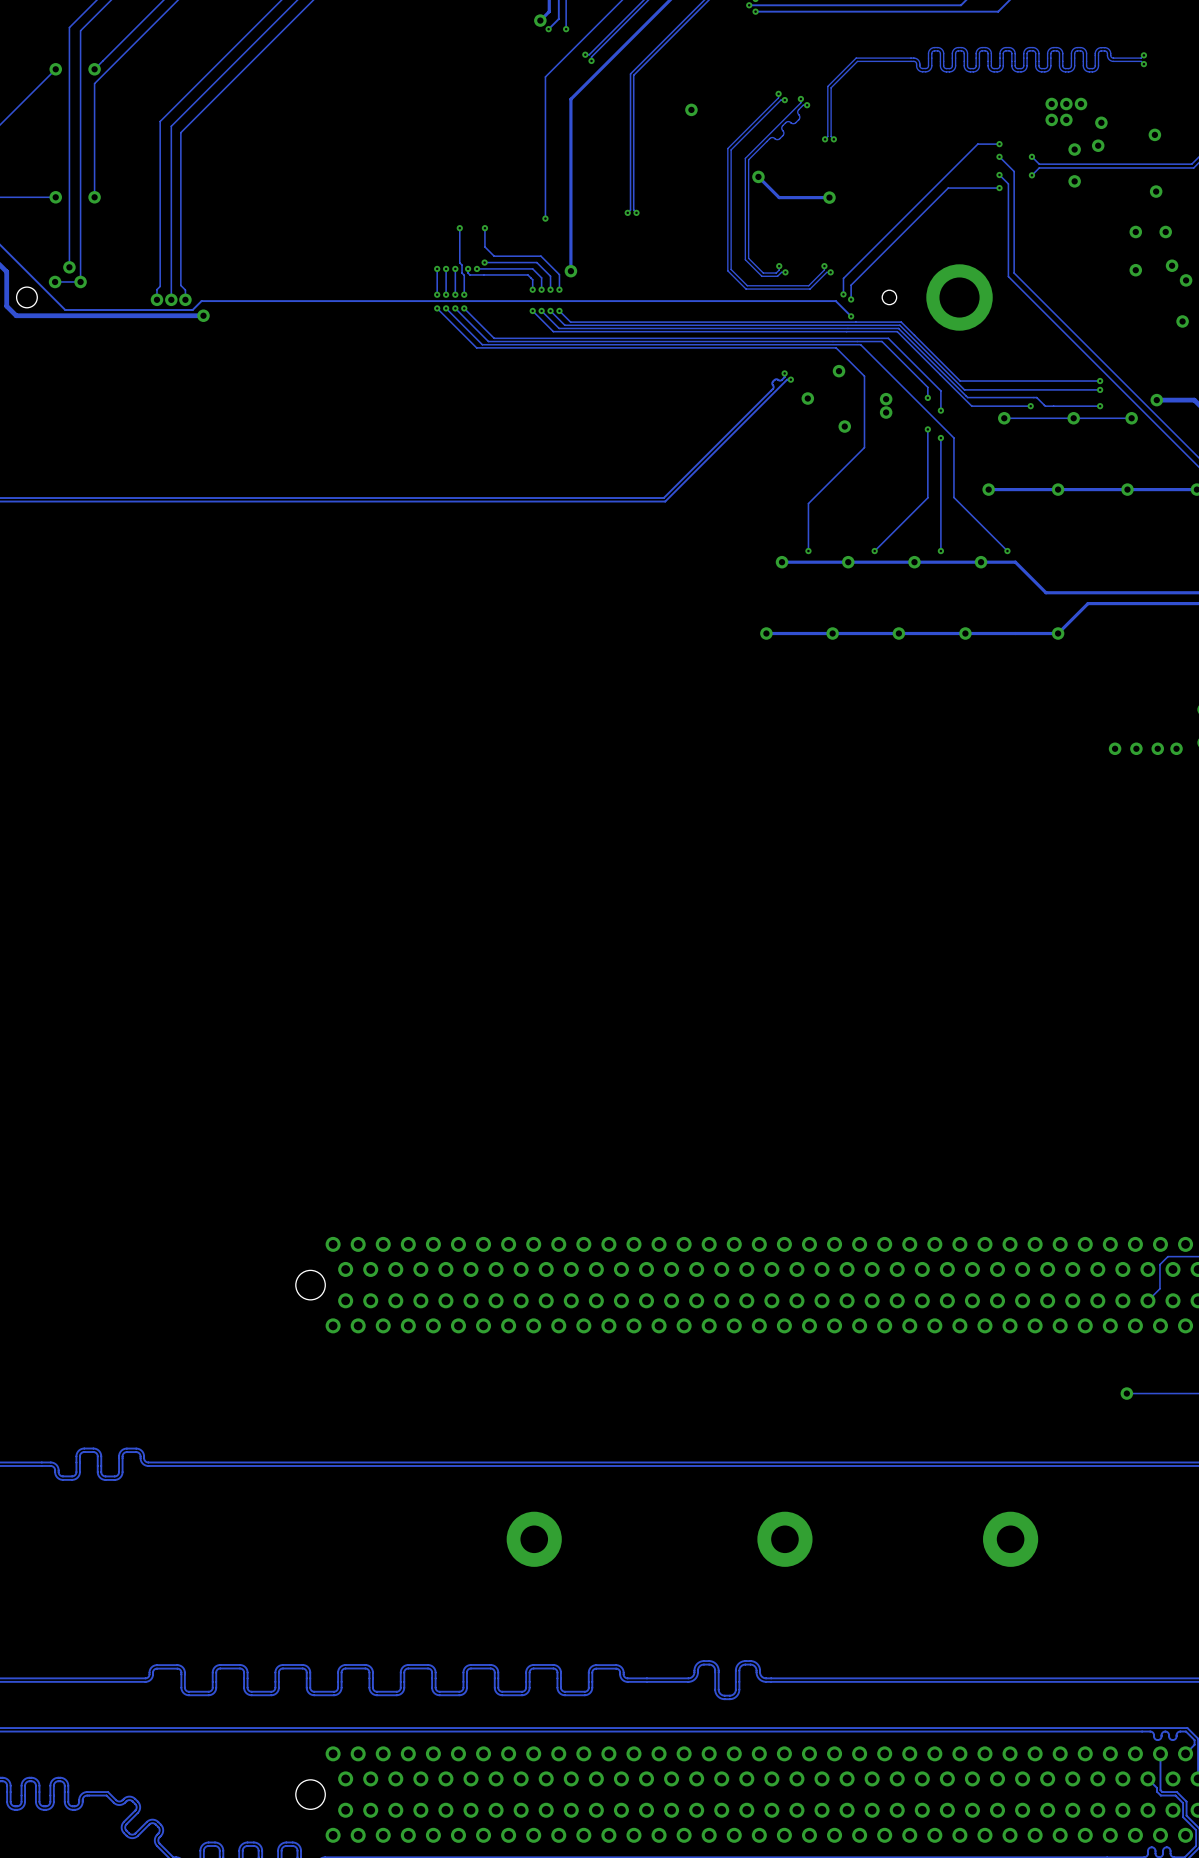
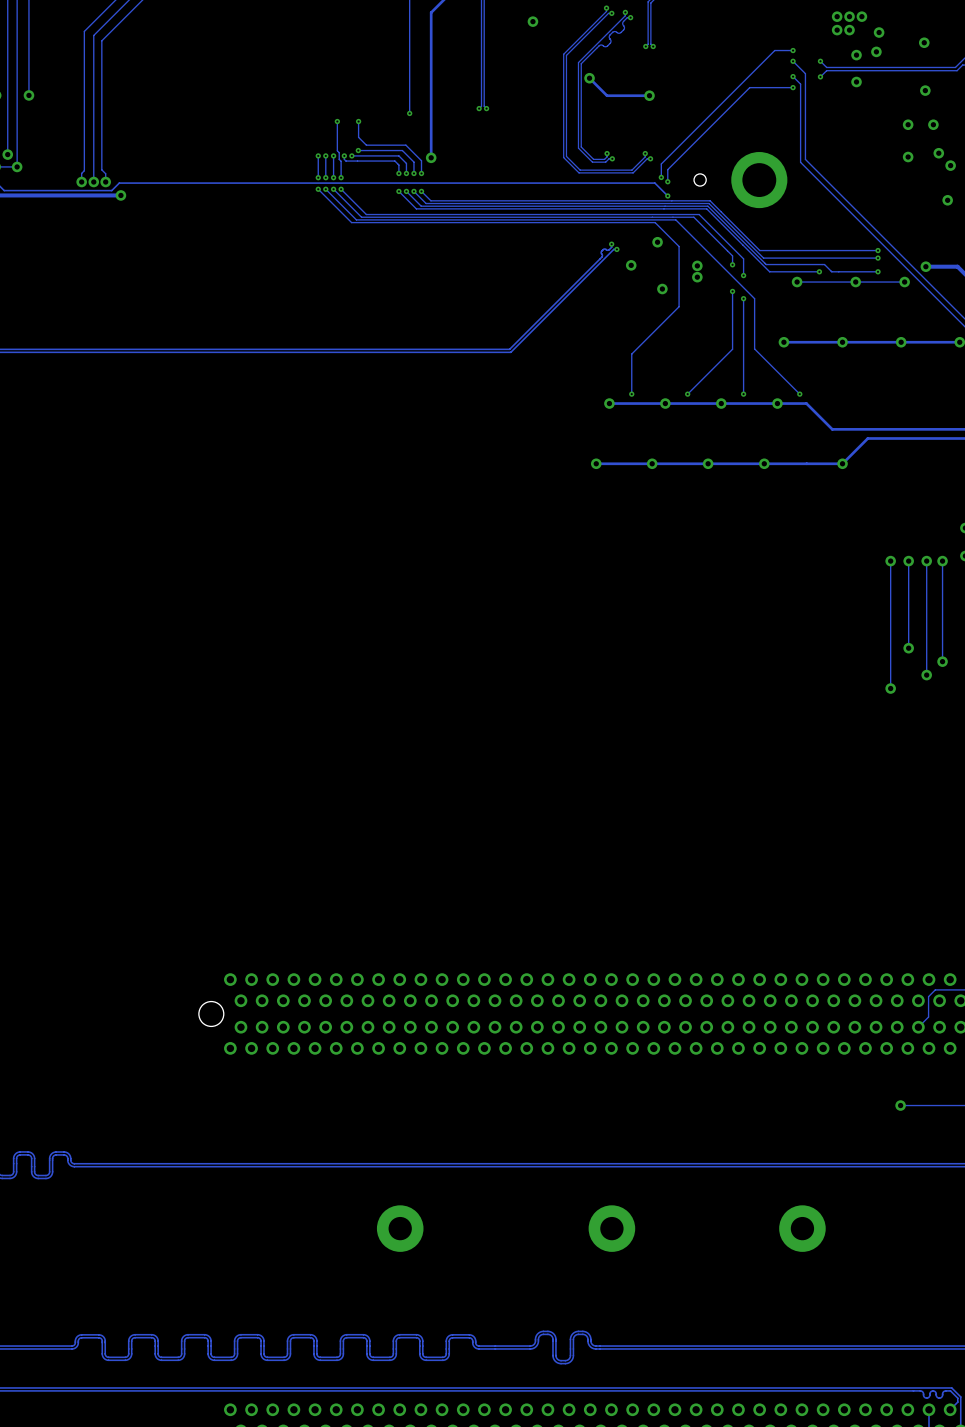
track: none -> (890, 561) (890, 688)
track: none -> (908, 561) (908, 648)
track: none -> (926, 561) (926, 675)
track: none -> (942, 561) (942, 661)
via: none -> (908, 648)
via: none -> (942, 661)
via: none -> (926, 675)
via: none -> (890, 688)

